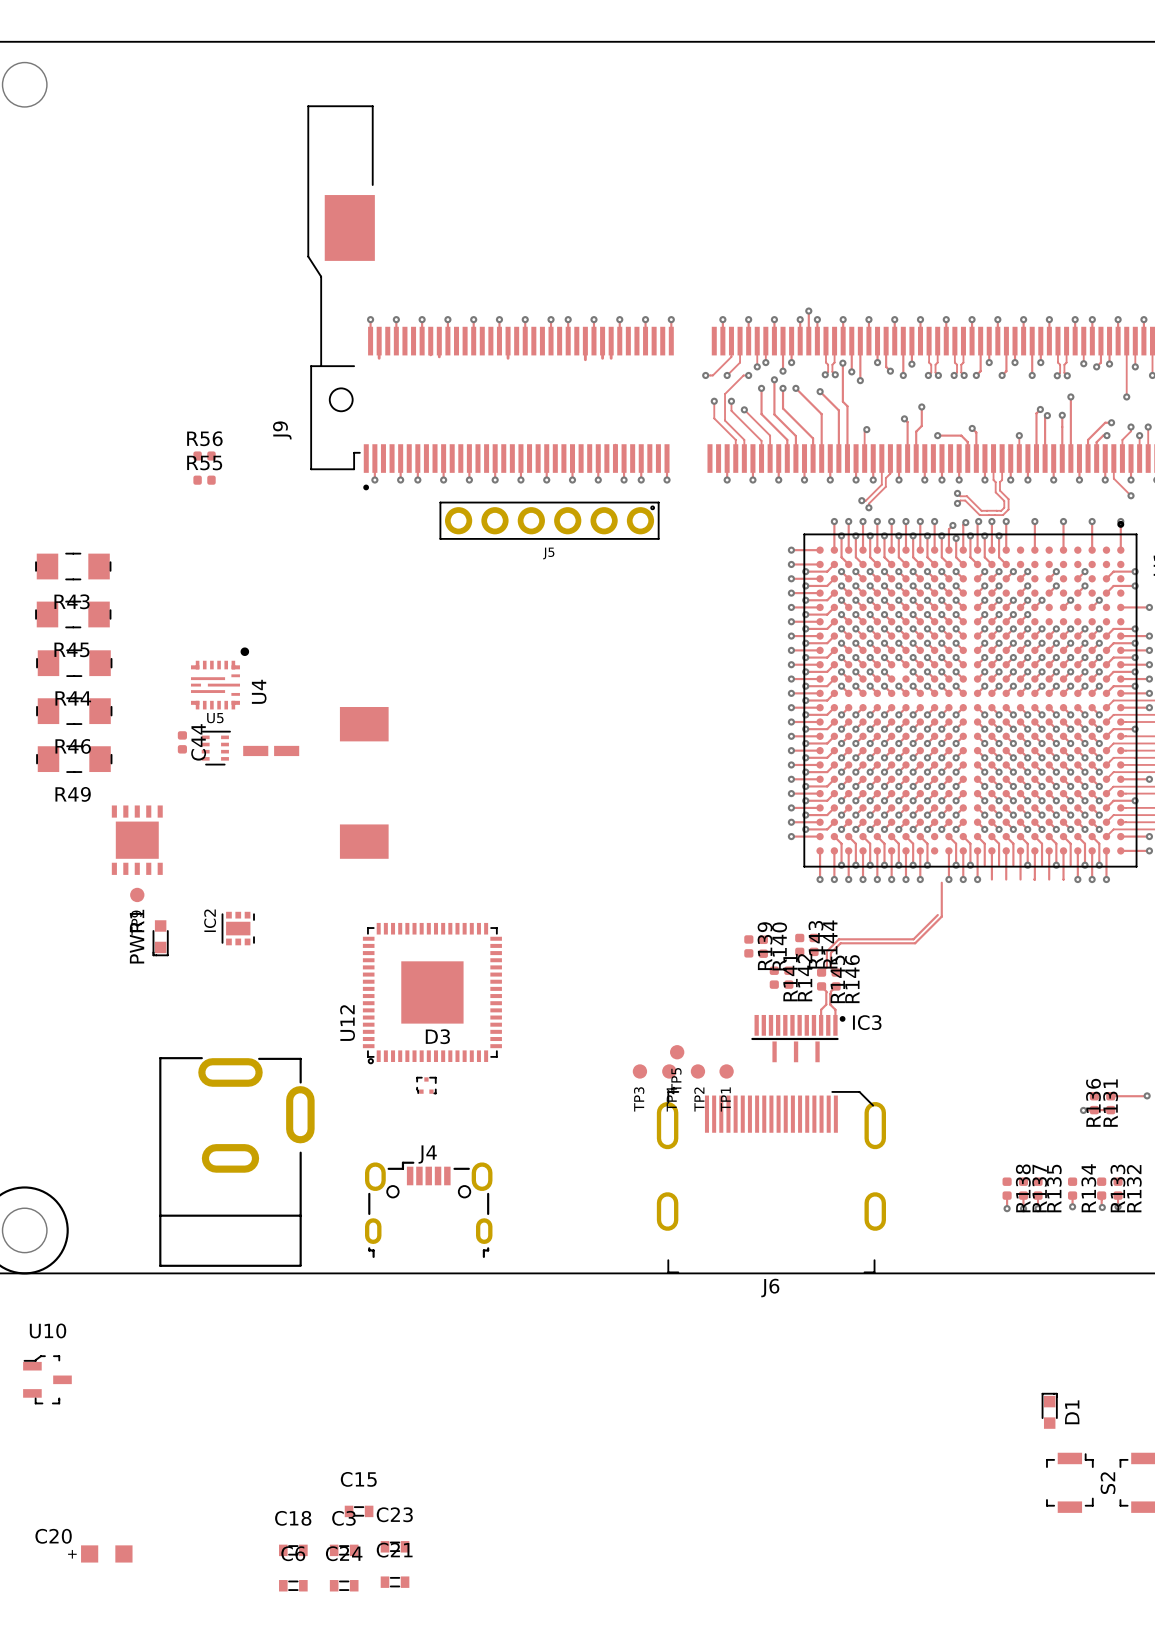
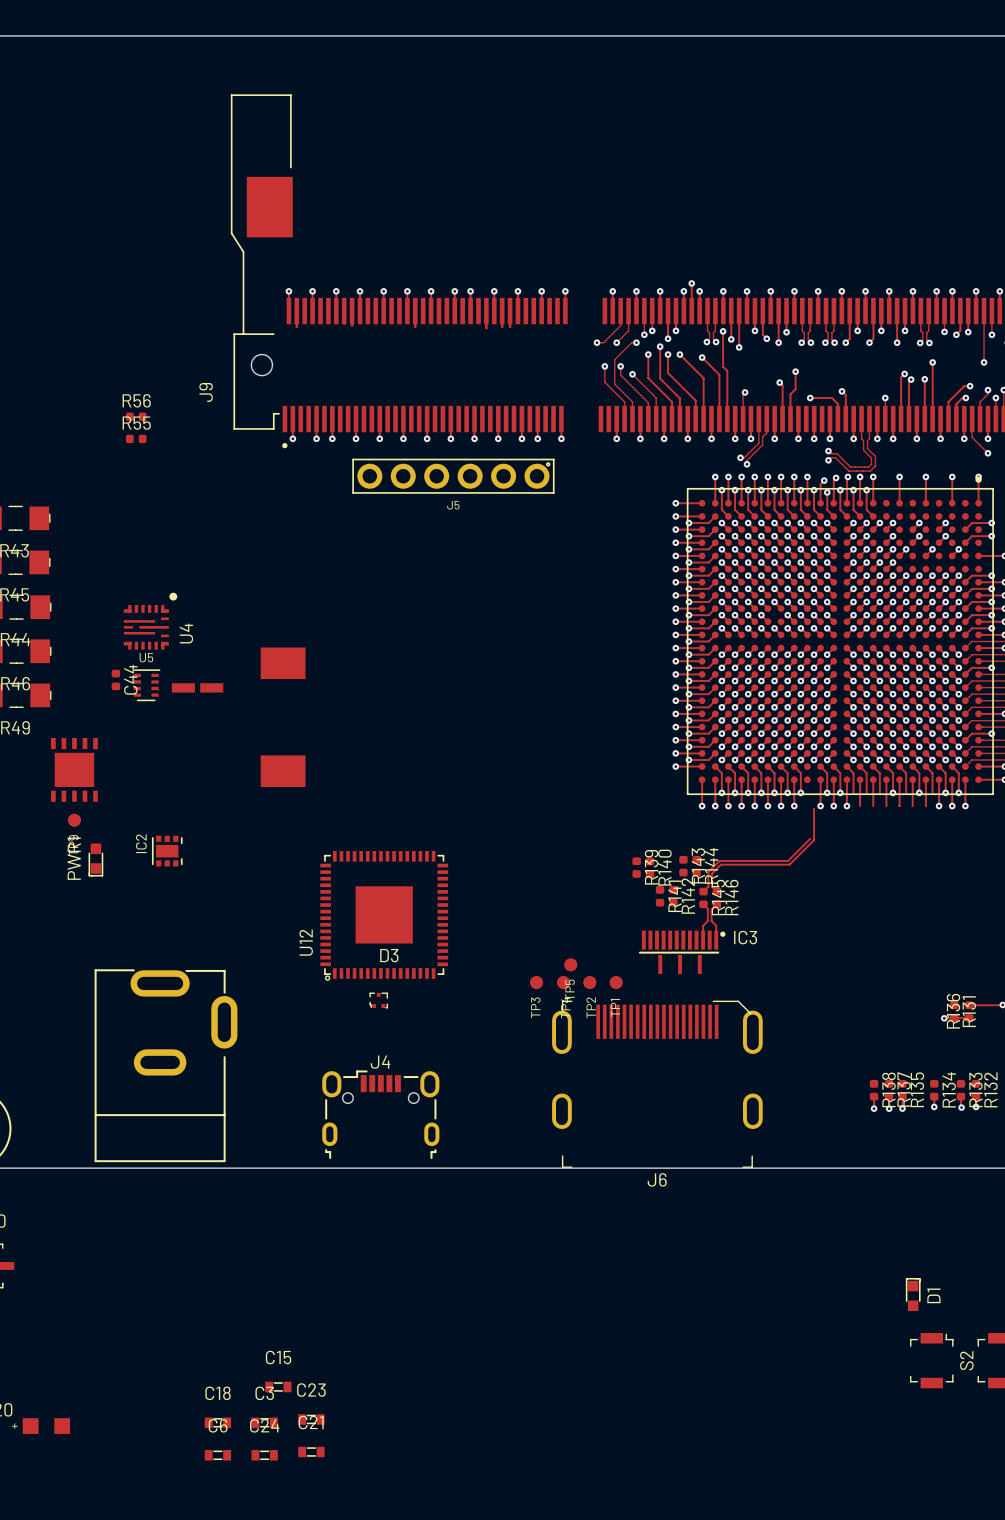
U12 position: (432, 993) -> (384, 915)
D3 position: (426, 1085) -> (378, 1000)
J4 position: (428, 1209) -> (380, 1114)

